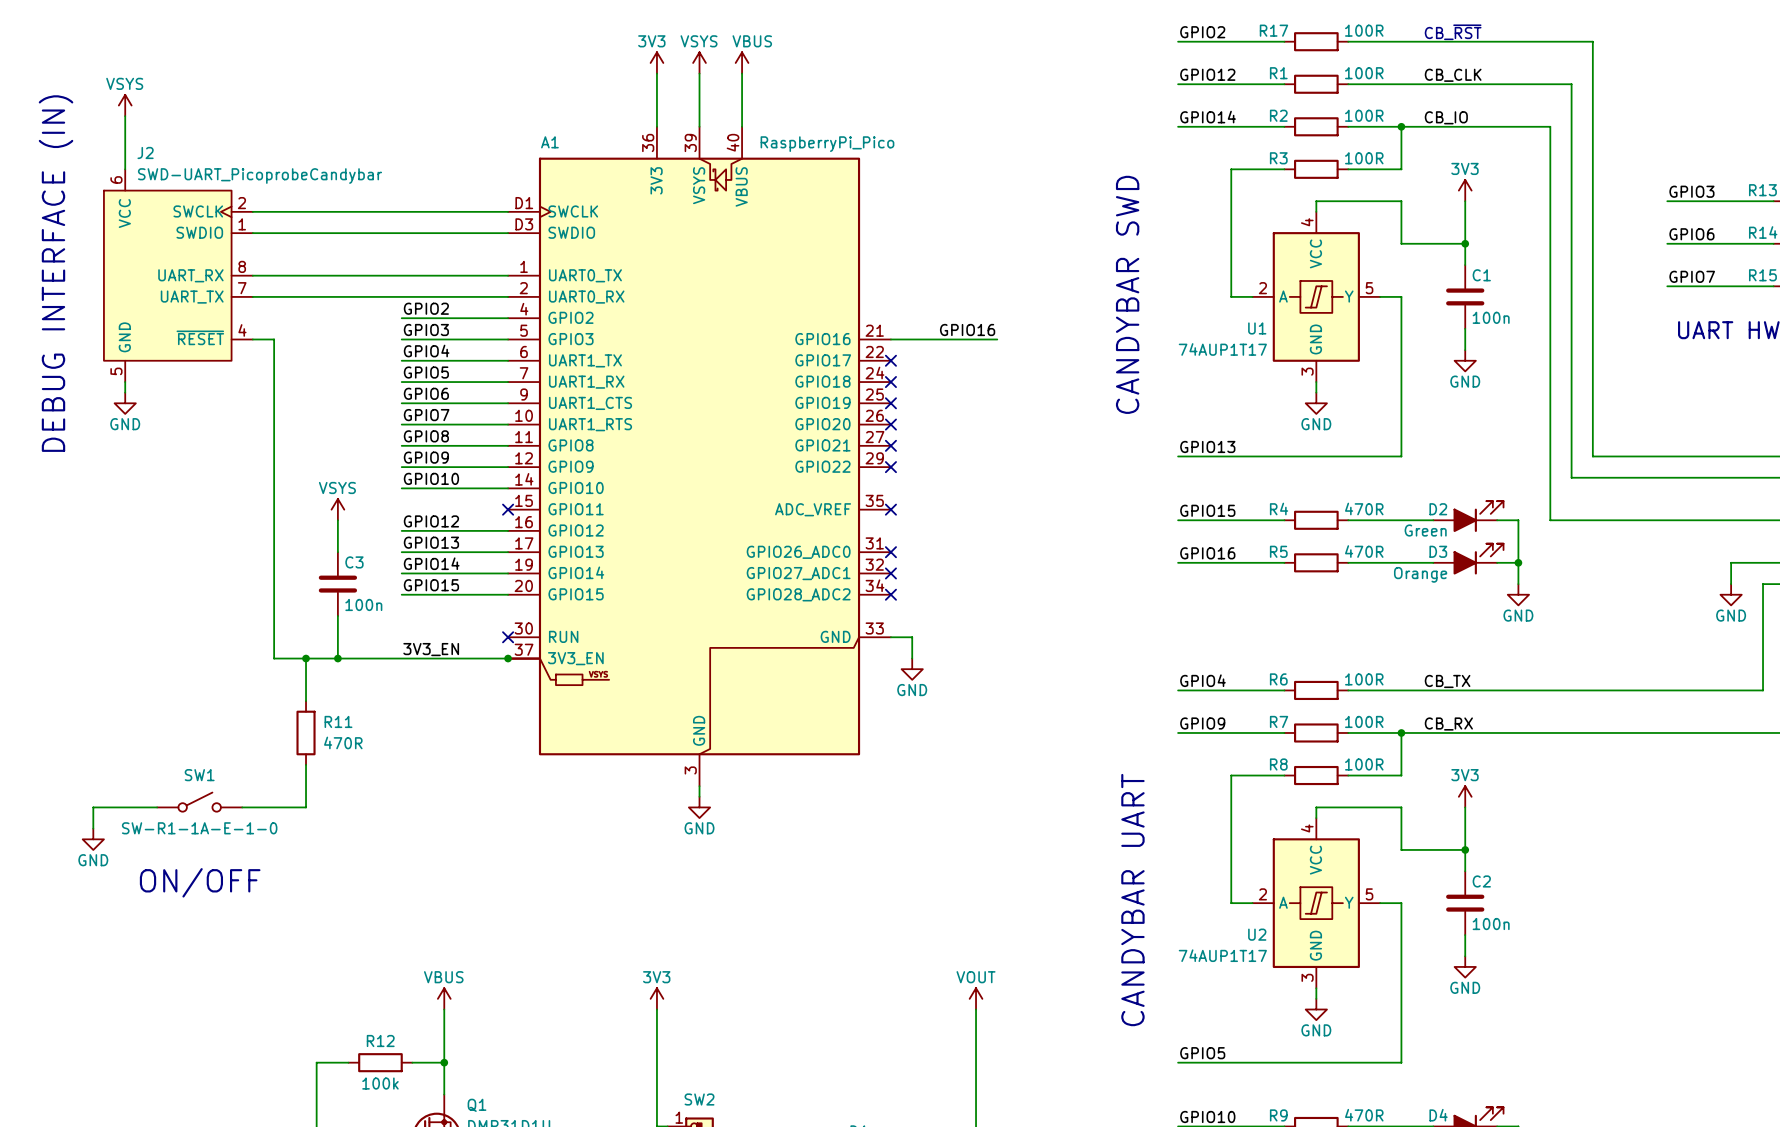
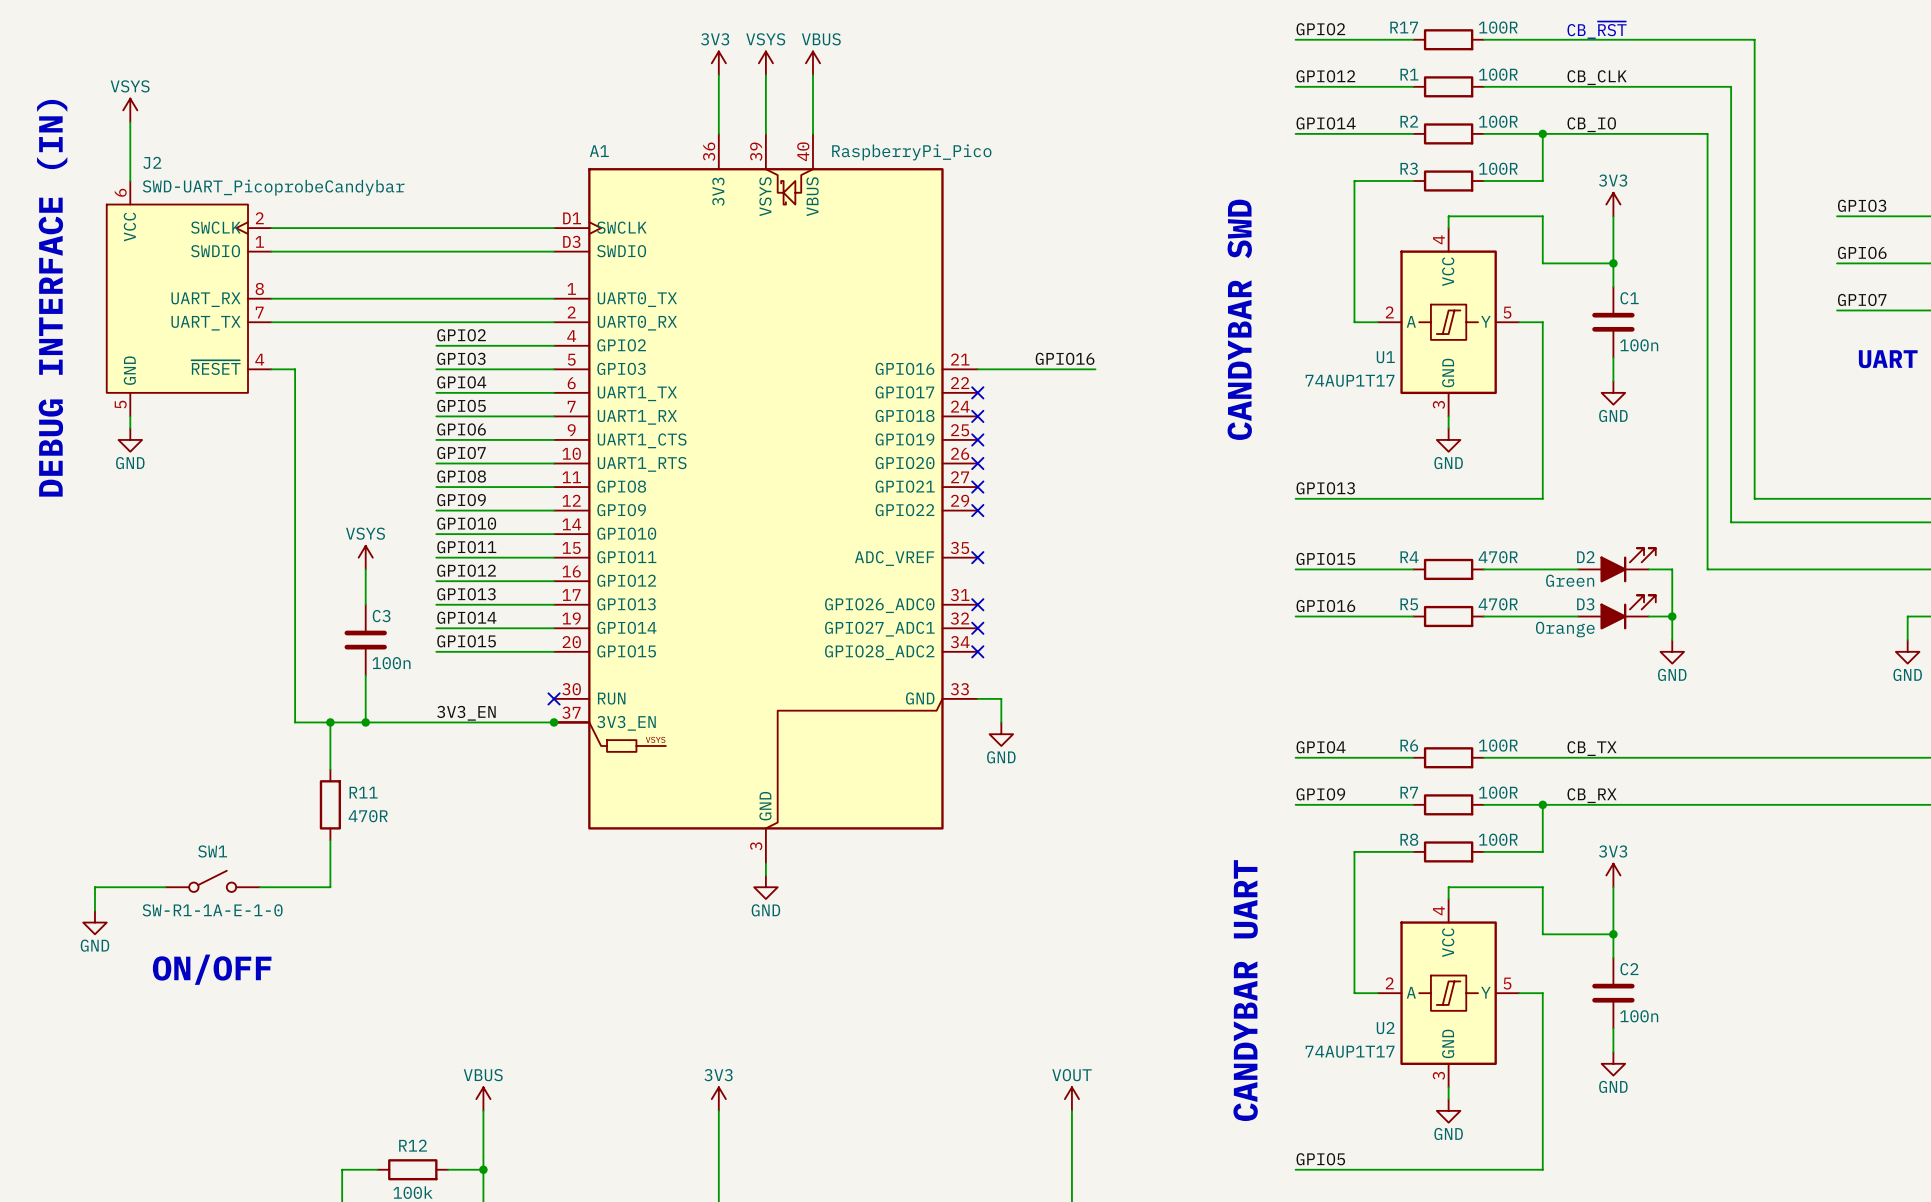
label: none -> GPIO11 (466, 547)
wire: none -> (436, 557) (554, 557)
no-connect mark: (508, 509) -> none

